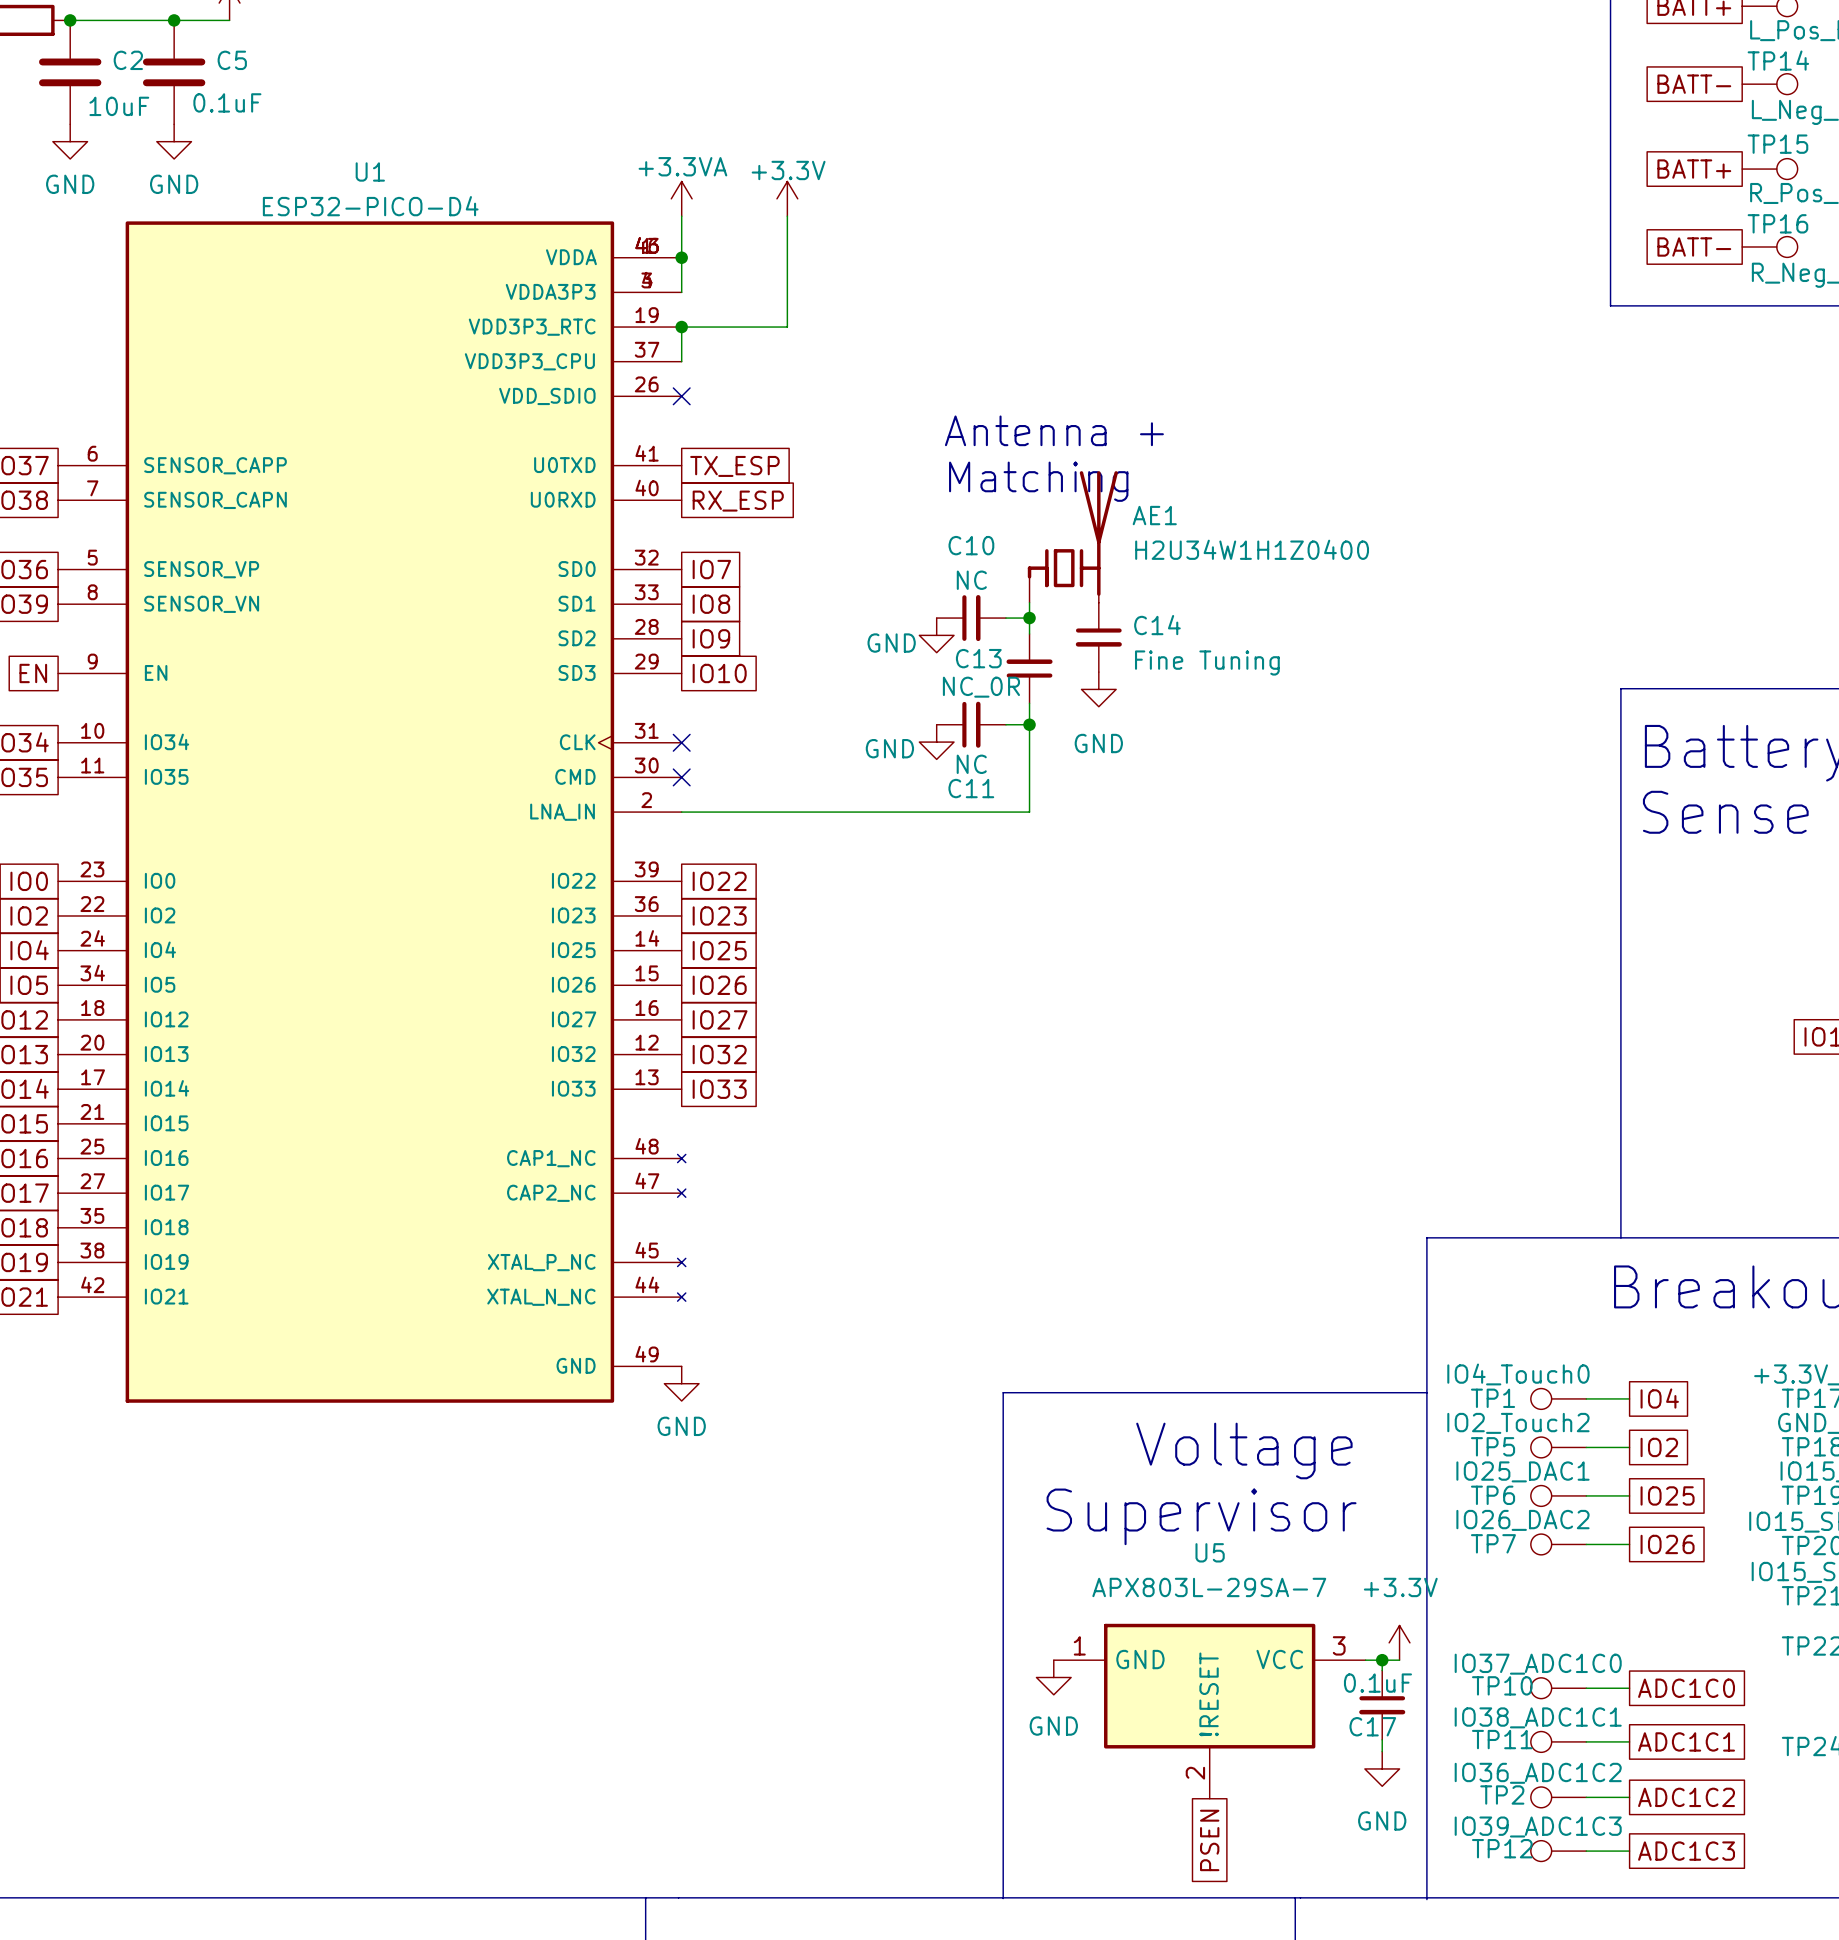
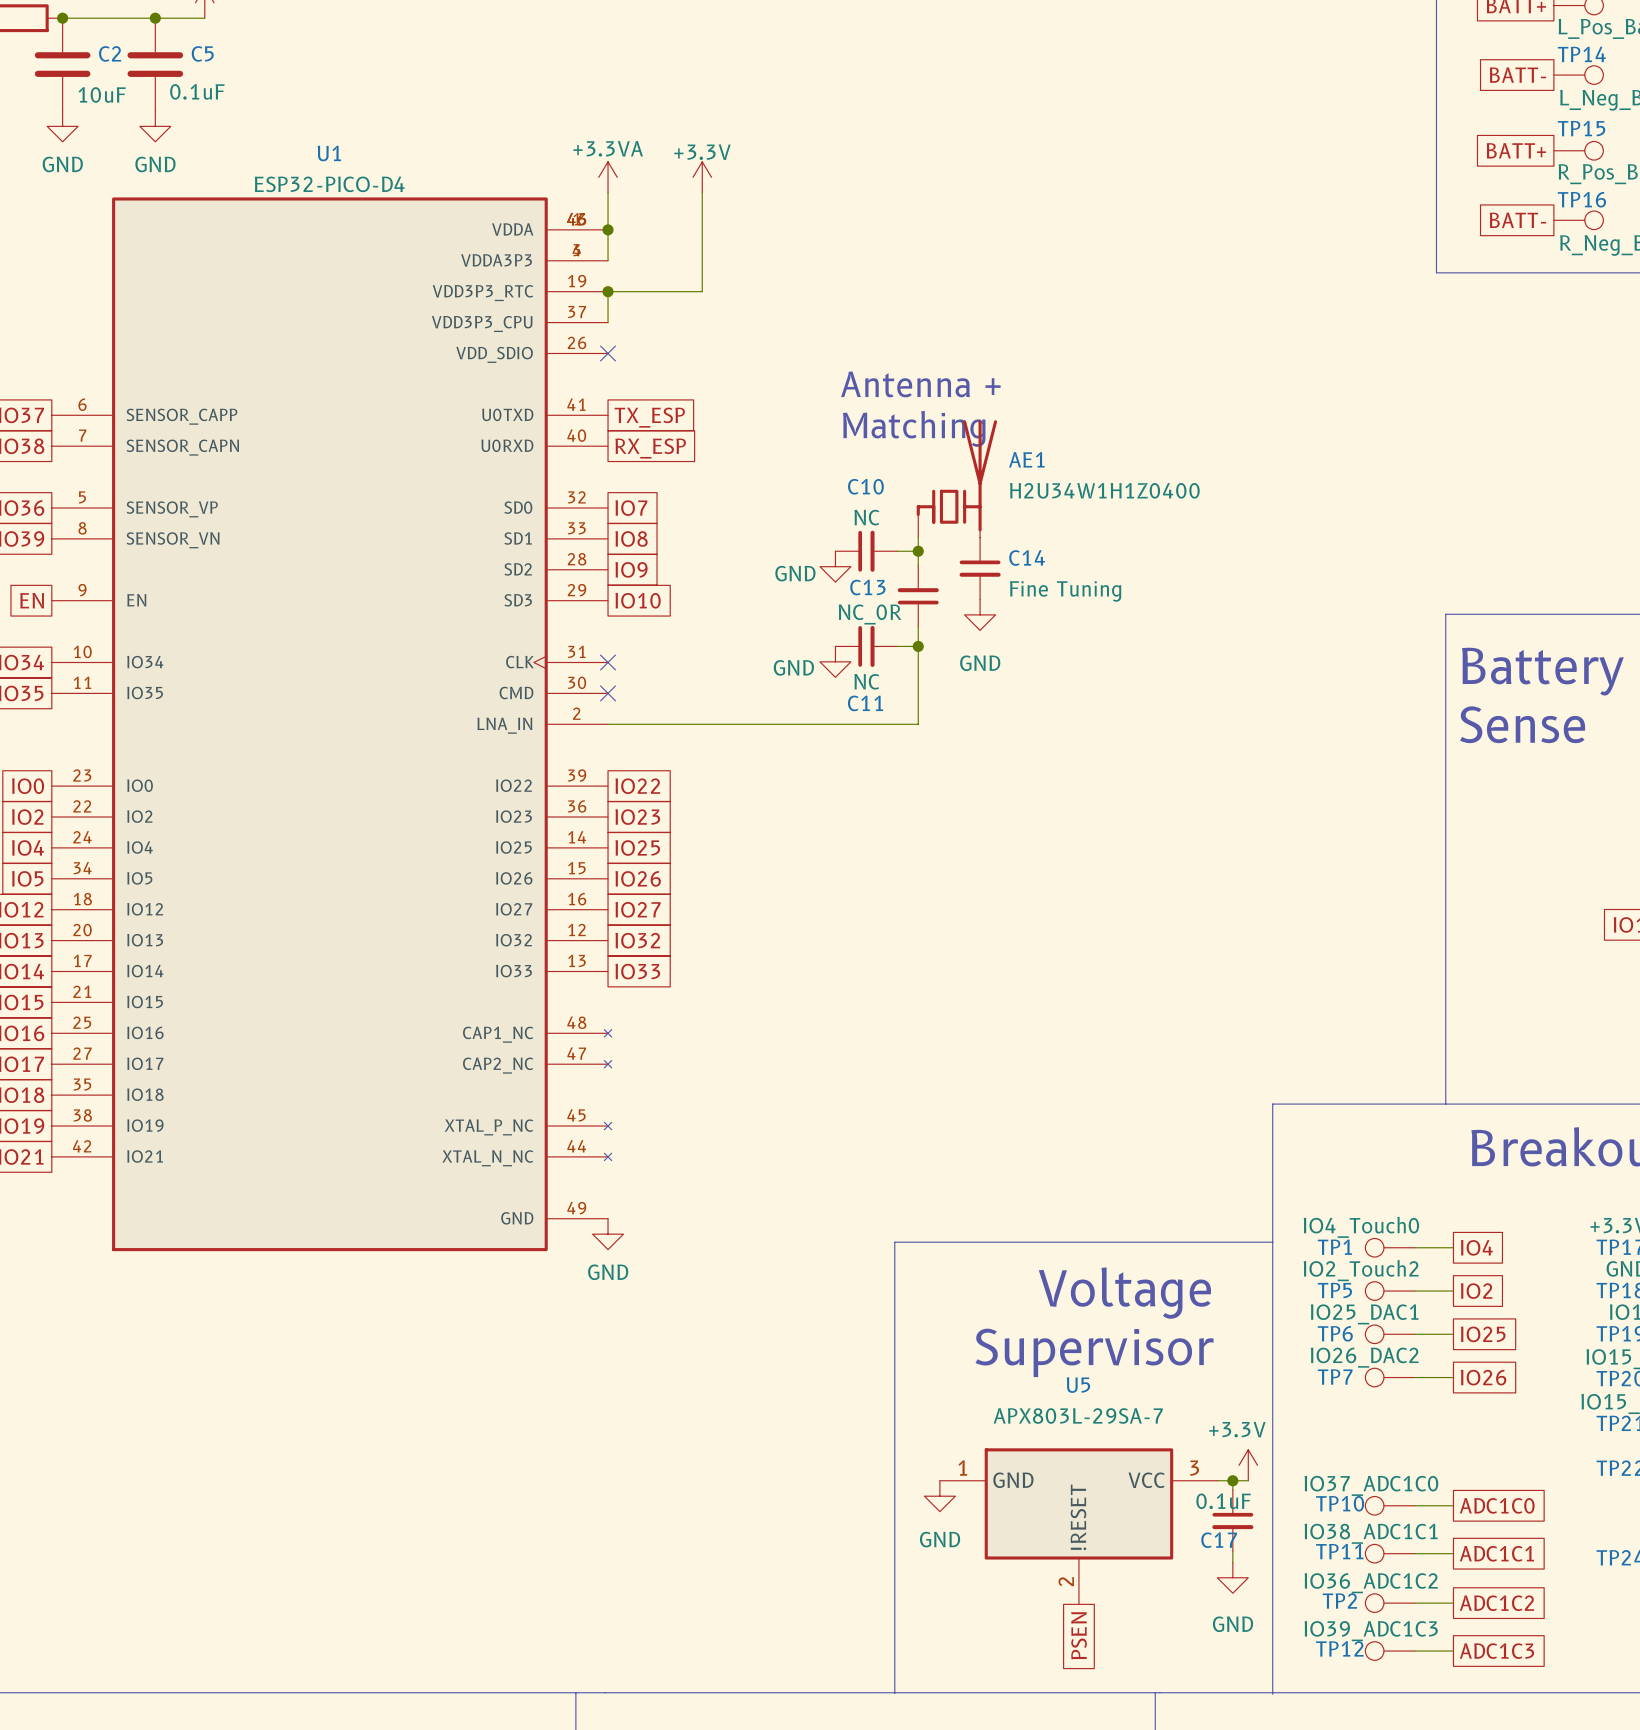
power symbol text position: +3.3V (1400, 1587) -> +3.3V (1237, 1429)

